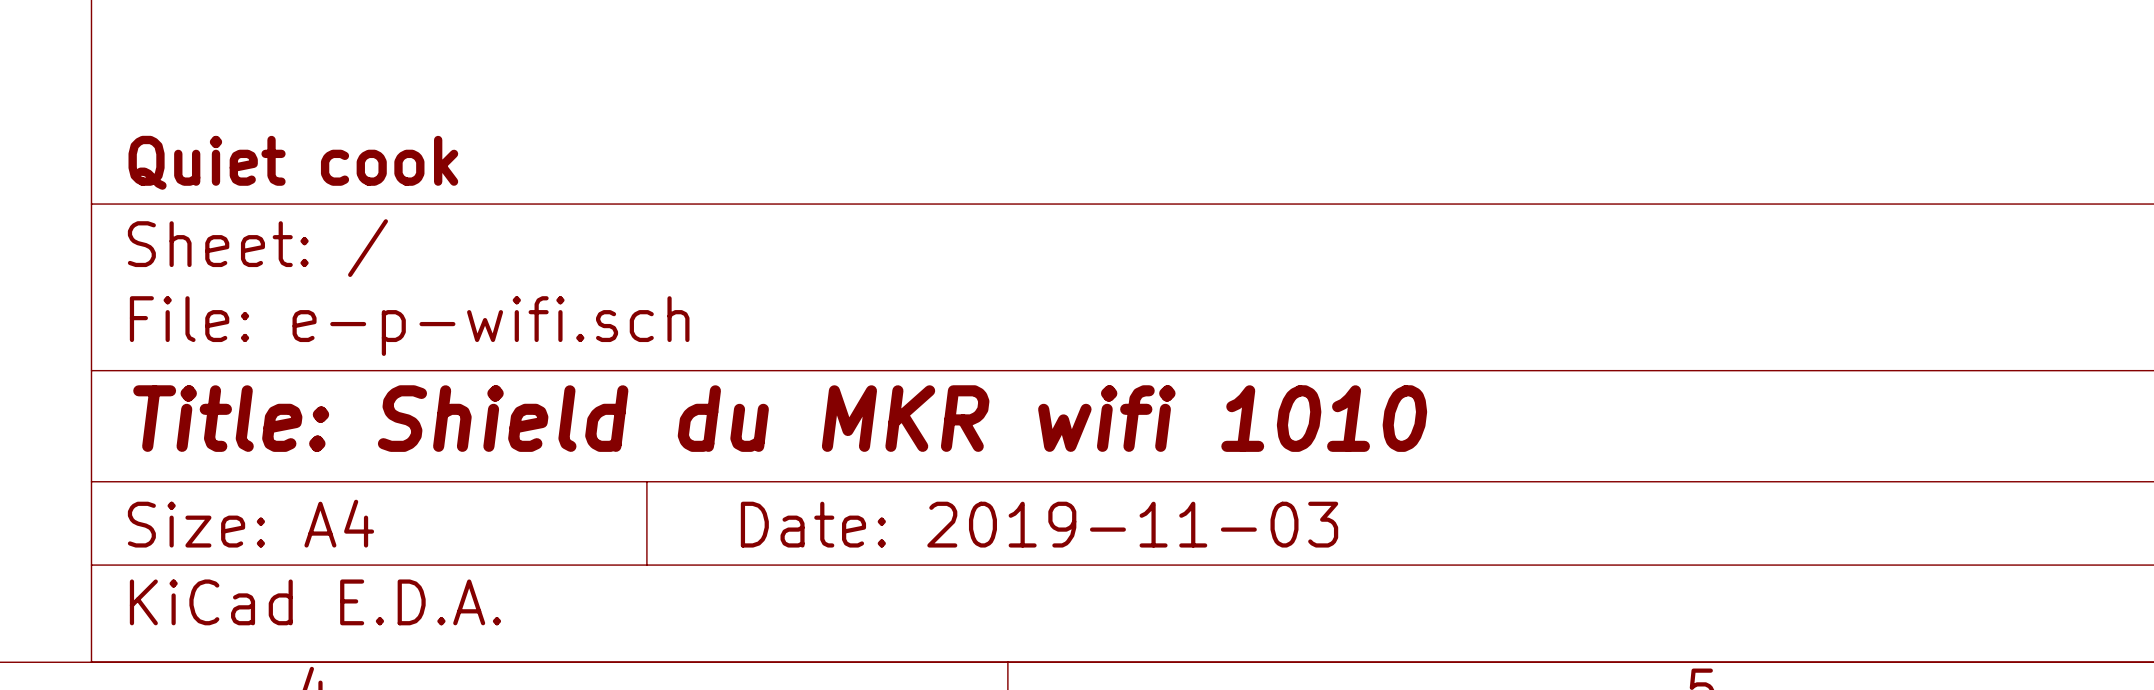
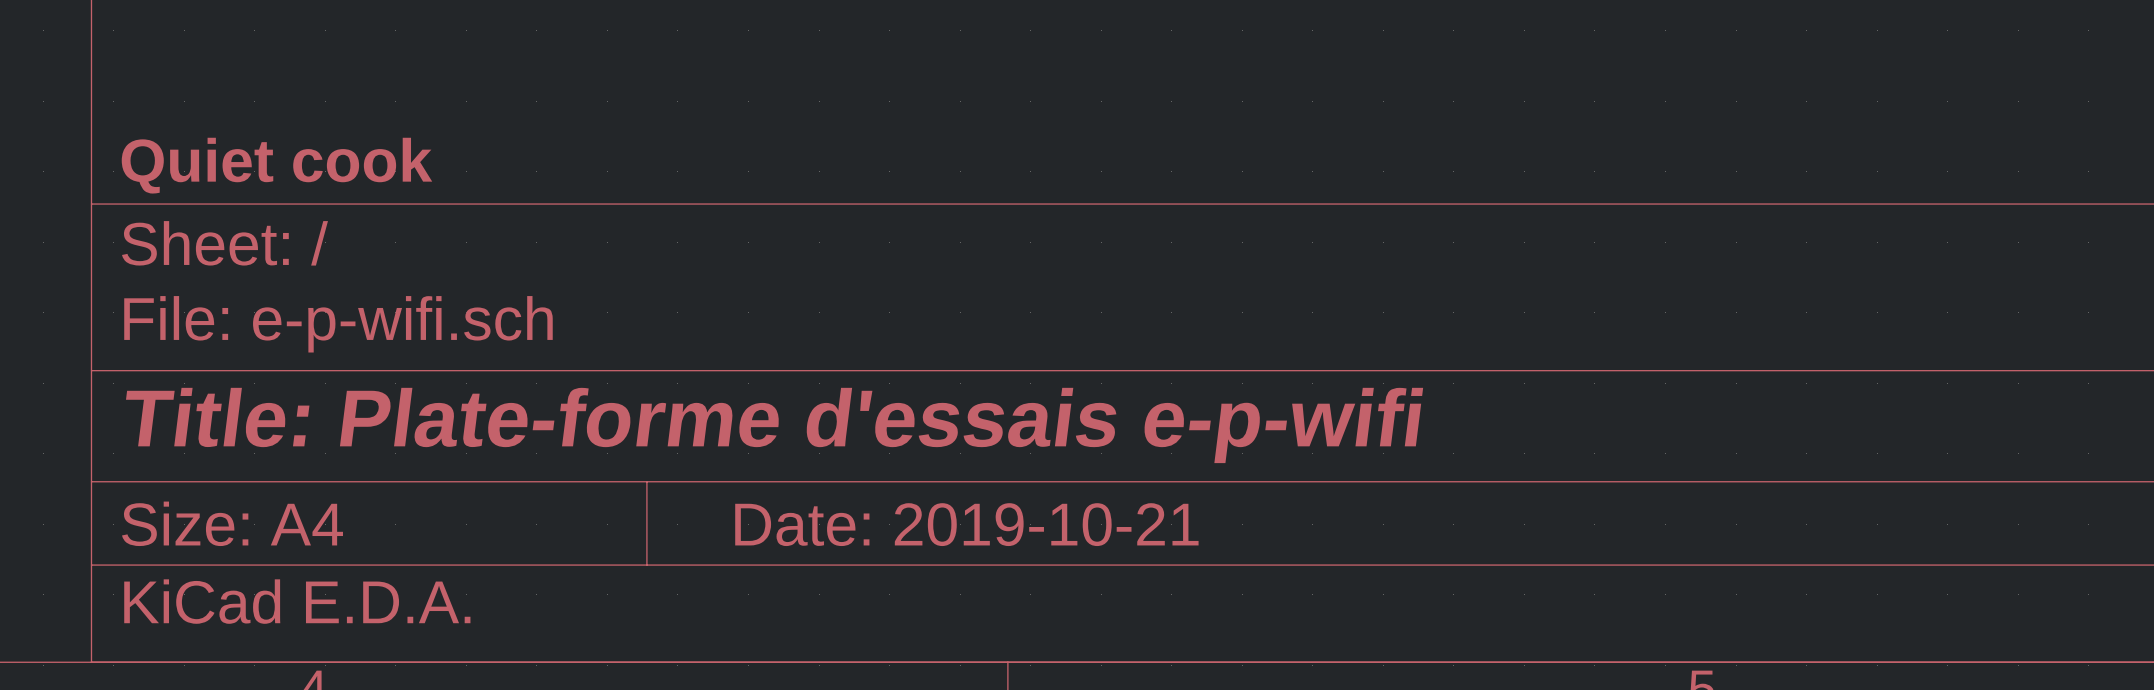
title block: Title: Shield du MKR wifi 1010 (780, 418) -> Title: Plate-forme d'essais e-p-wifi (774, 425)
title block: Date: 2019-11-03 (1039, 524) -> Date: 2019-10-21 (966, 524)

